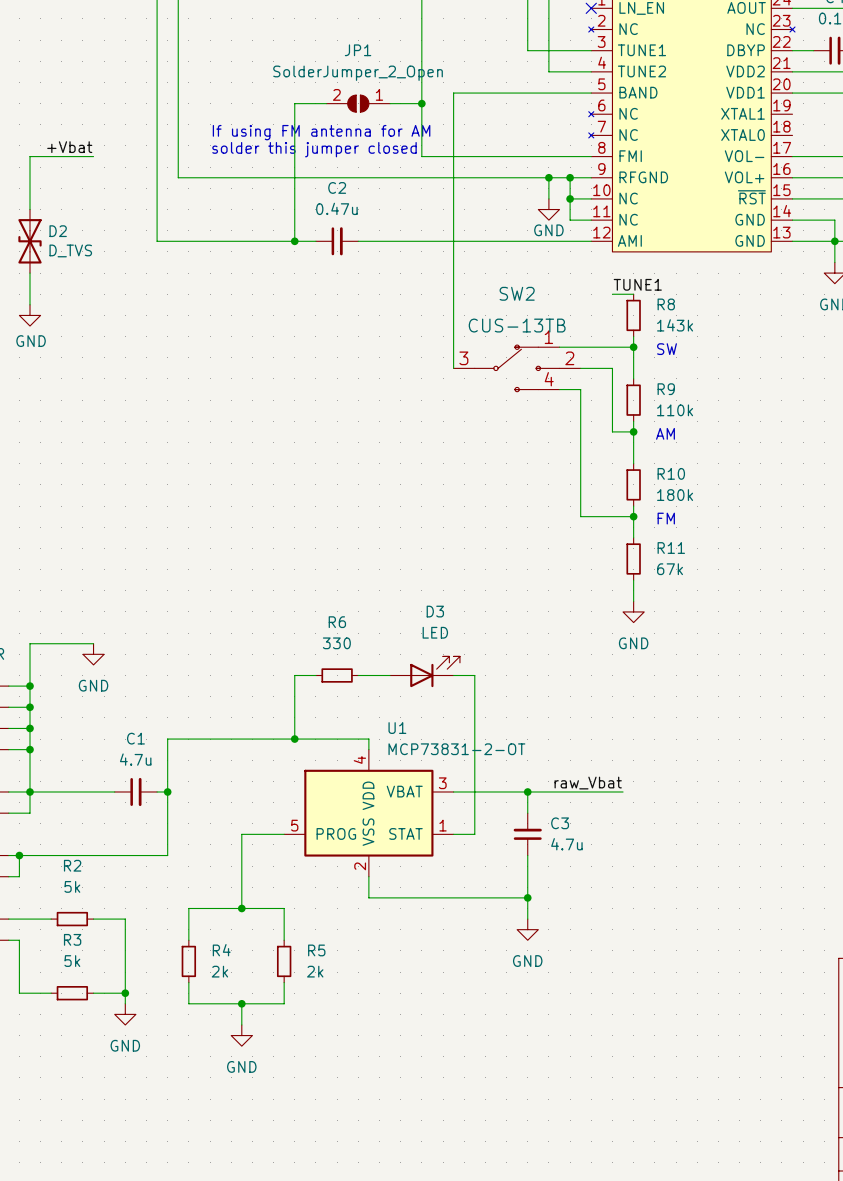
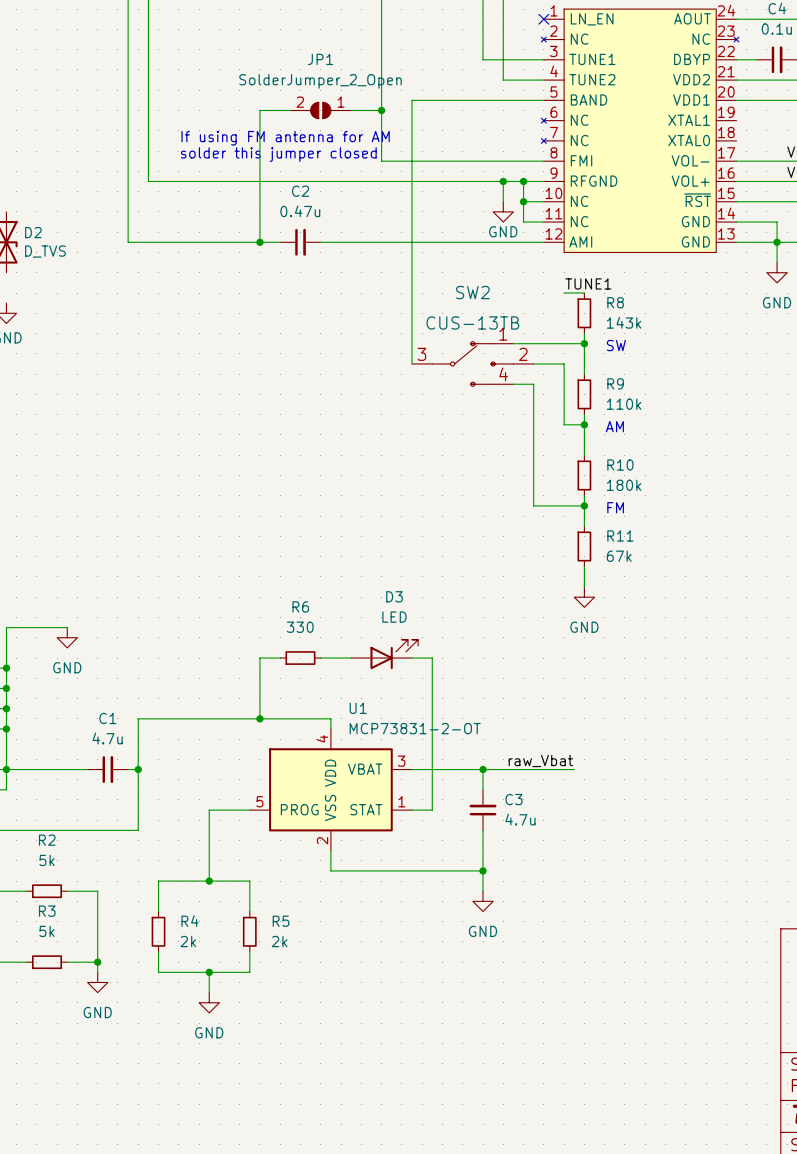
label: +Vbat (69, 147) -> none
wire: (93, 156) (29, 156) (29, 209) -> none
wire: (29, 273) (29, 304) -> none

